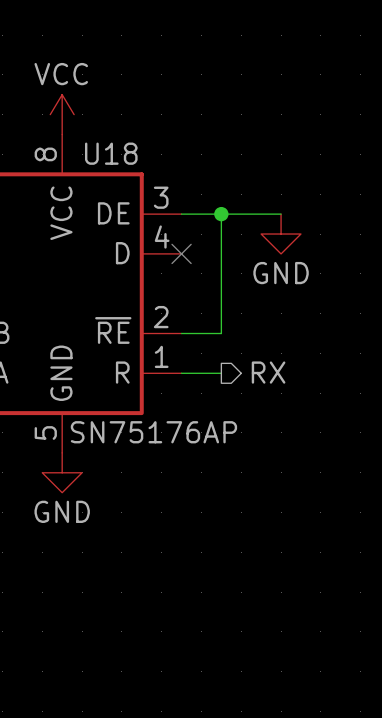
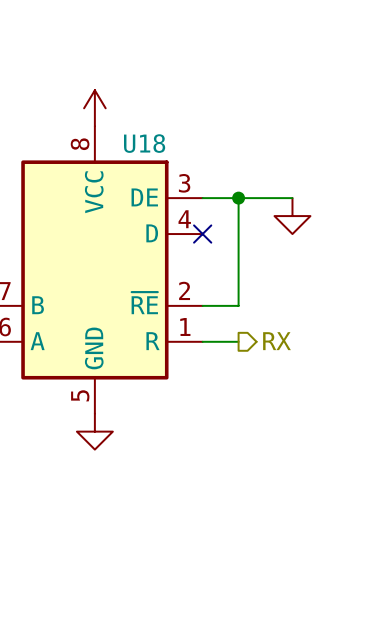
power symbol text: VCC (61, 74) -> none
power symbol text: GND (281, 273) -> none
U18 value: SN75176AP (153, 432) -> none
power symbol text: GND (62, 511) -> none

